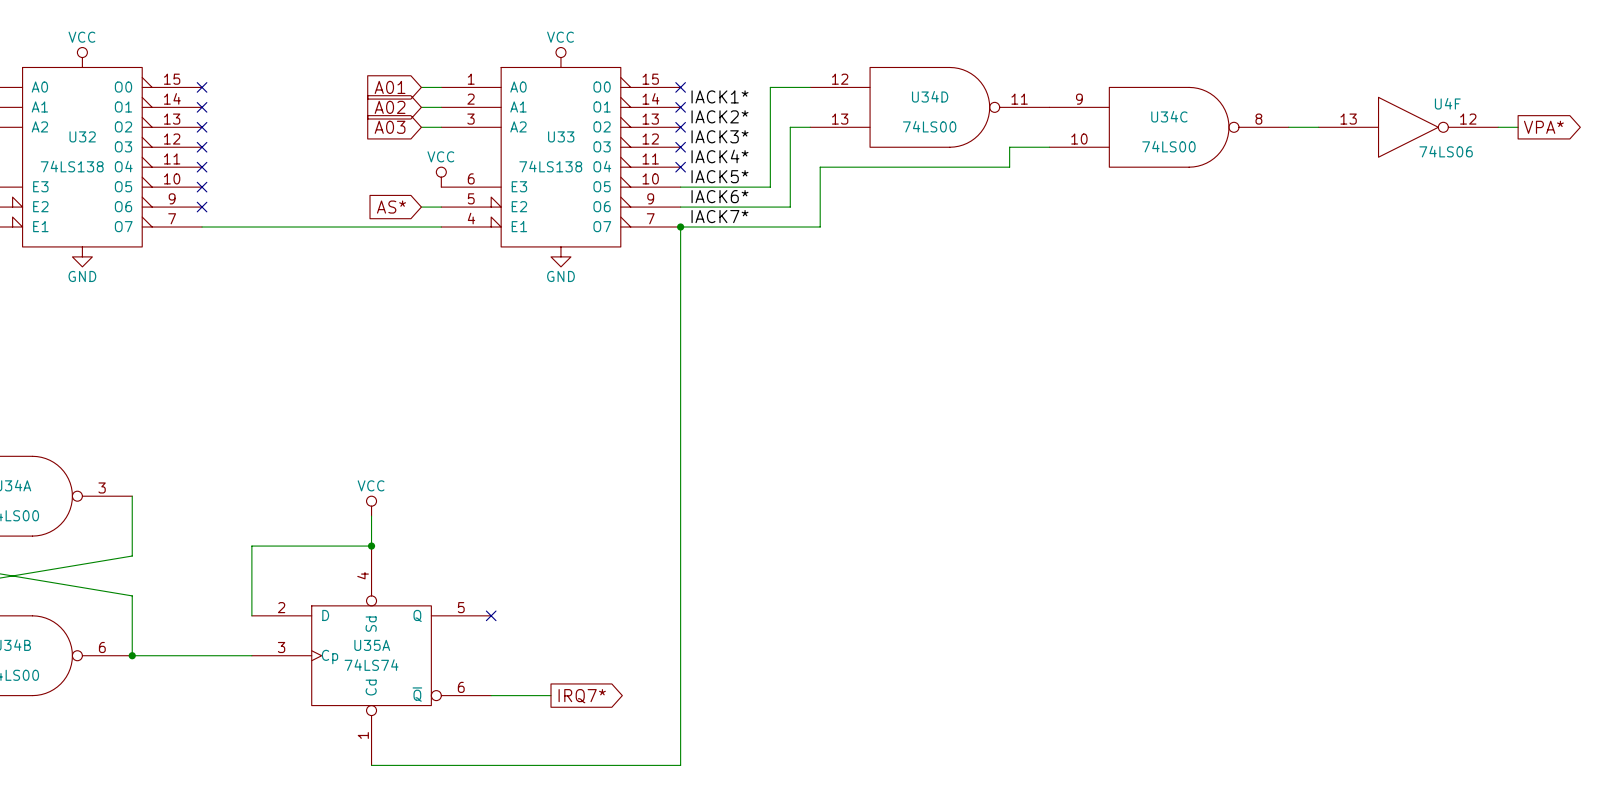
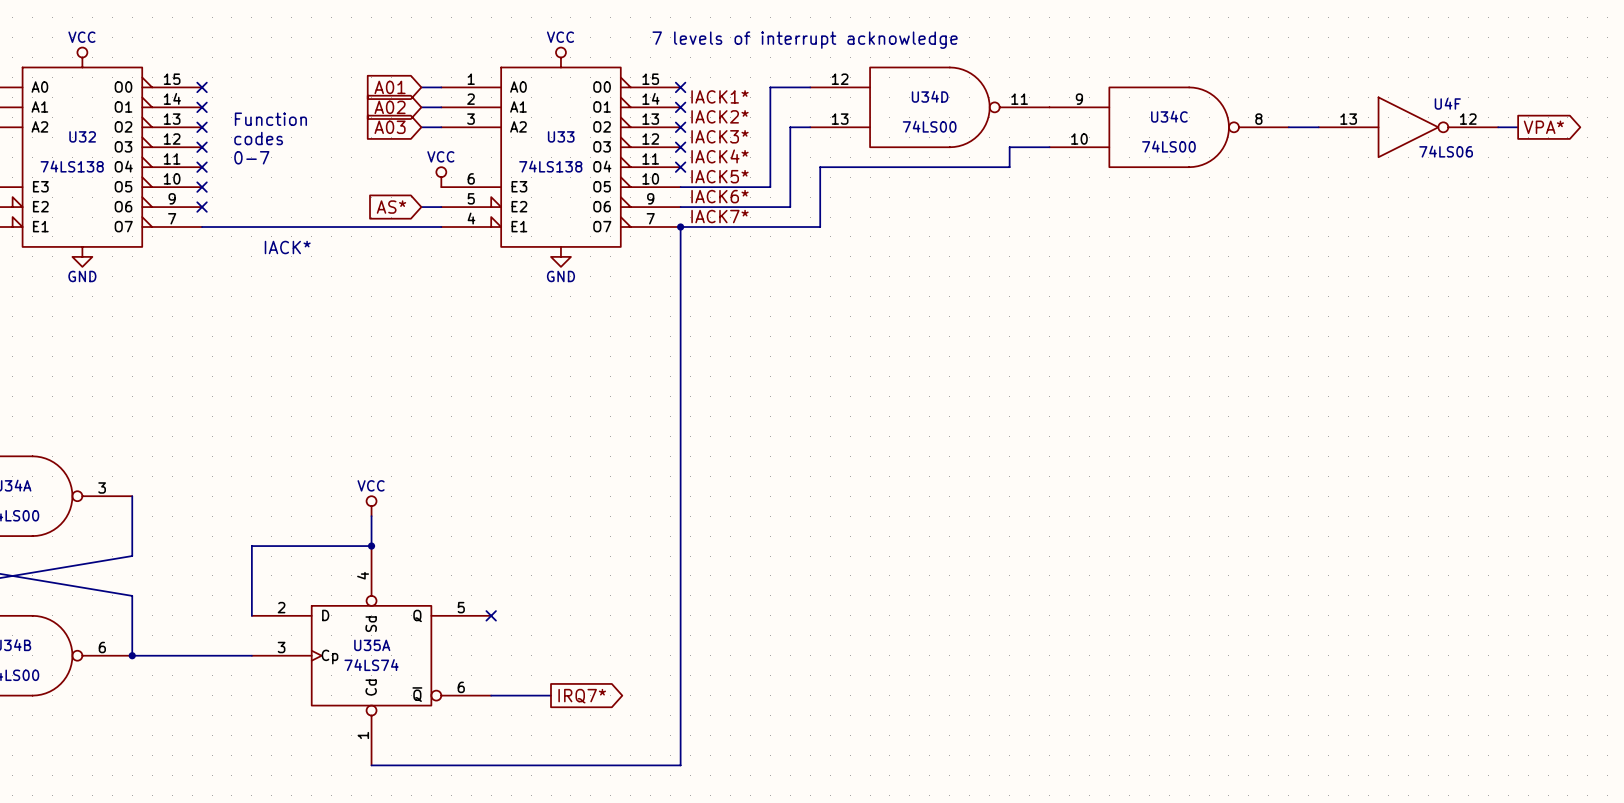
text: none -> 7 levels of interrupt acknowledge (805, 40)
text: none -> Function (270, 119)
text: none -> codes (258, 138)
text: none -> 0-7 (251, 157)
text: none -> IACK* (287, 247)

